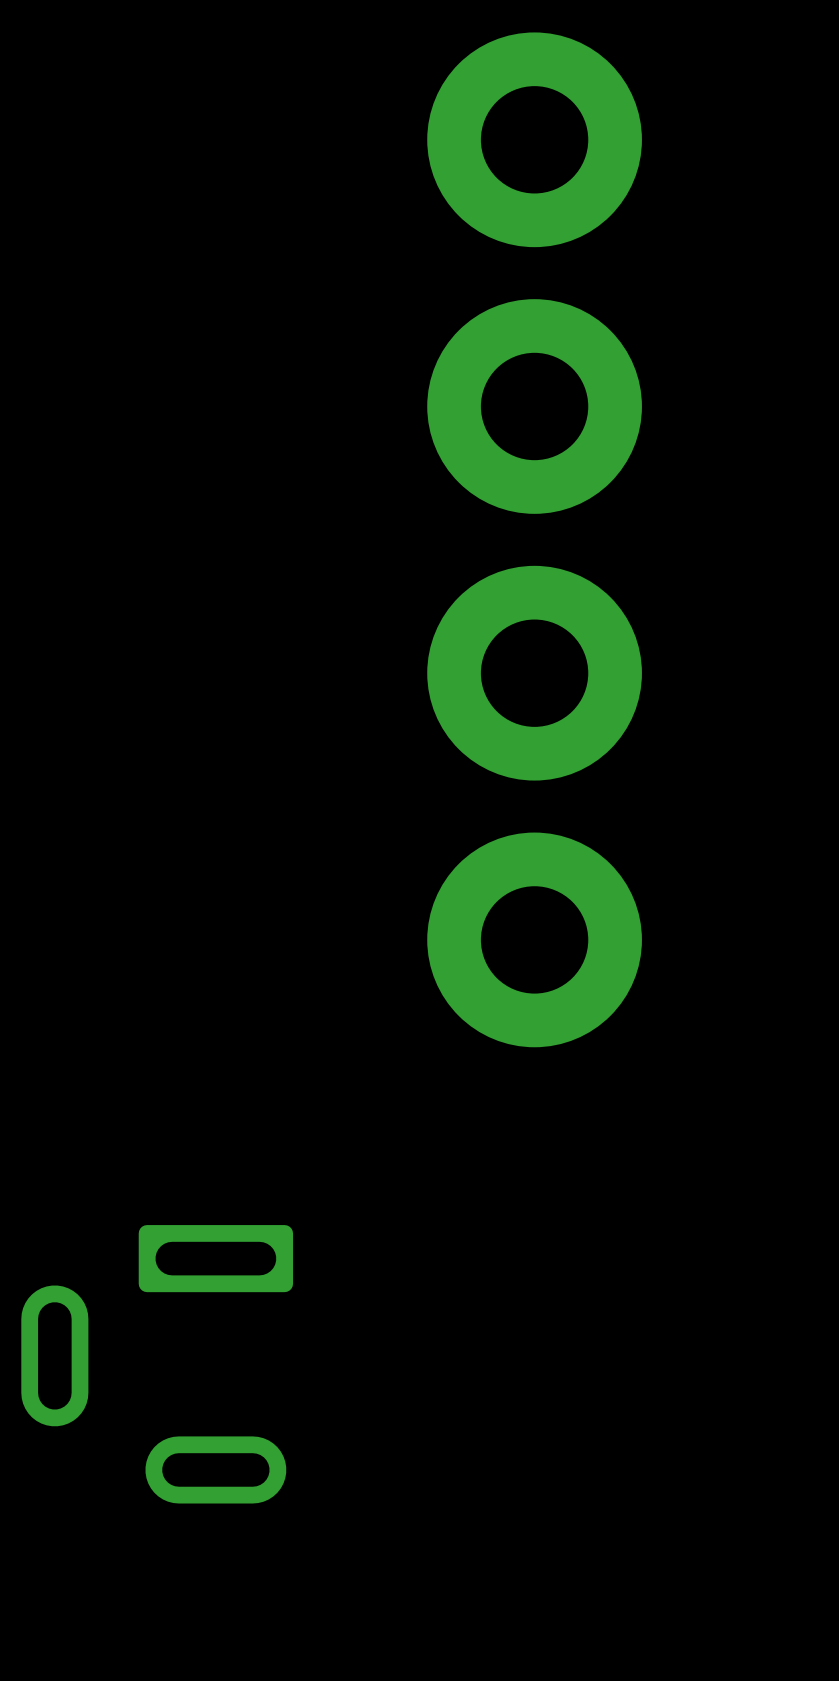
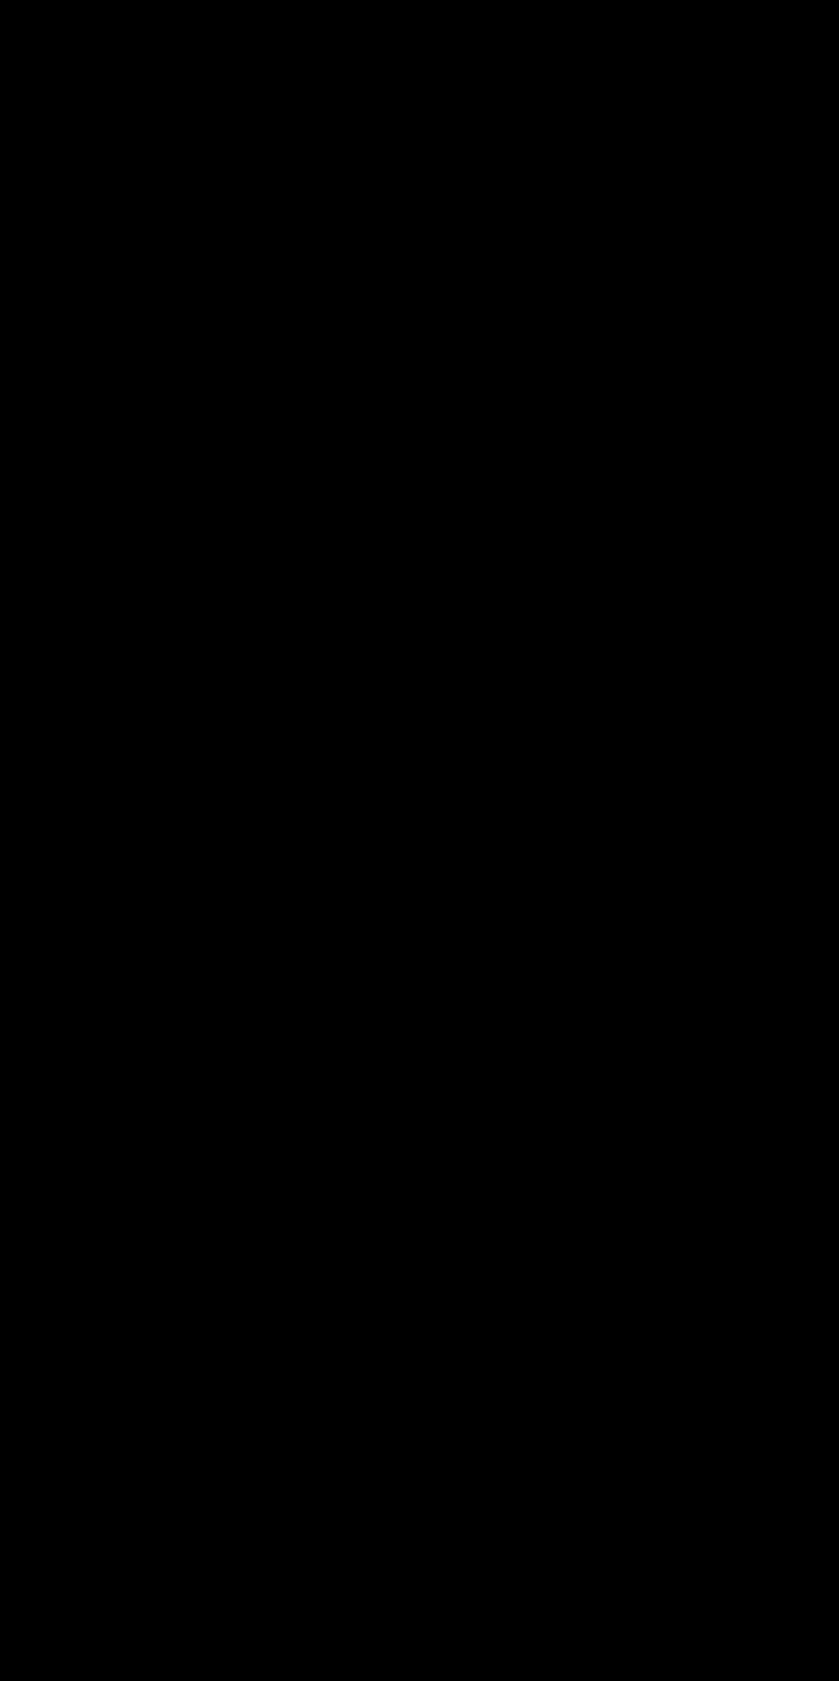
part: (534, 139) -> none
part: (534, 406) -> none
part: (534, 673) -> none
part: (534, 939) -> none
part: (157, 1364) -> none

